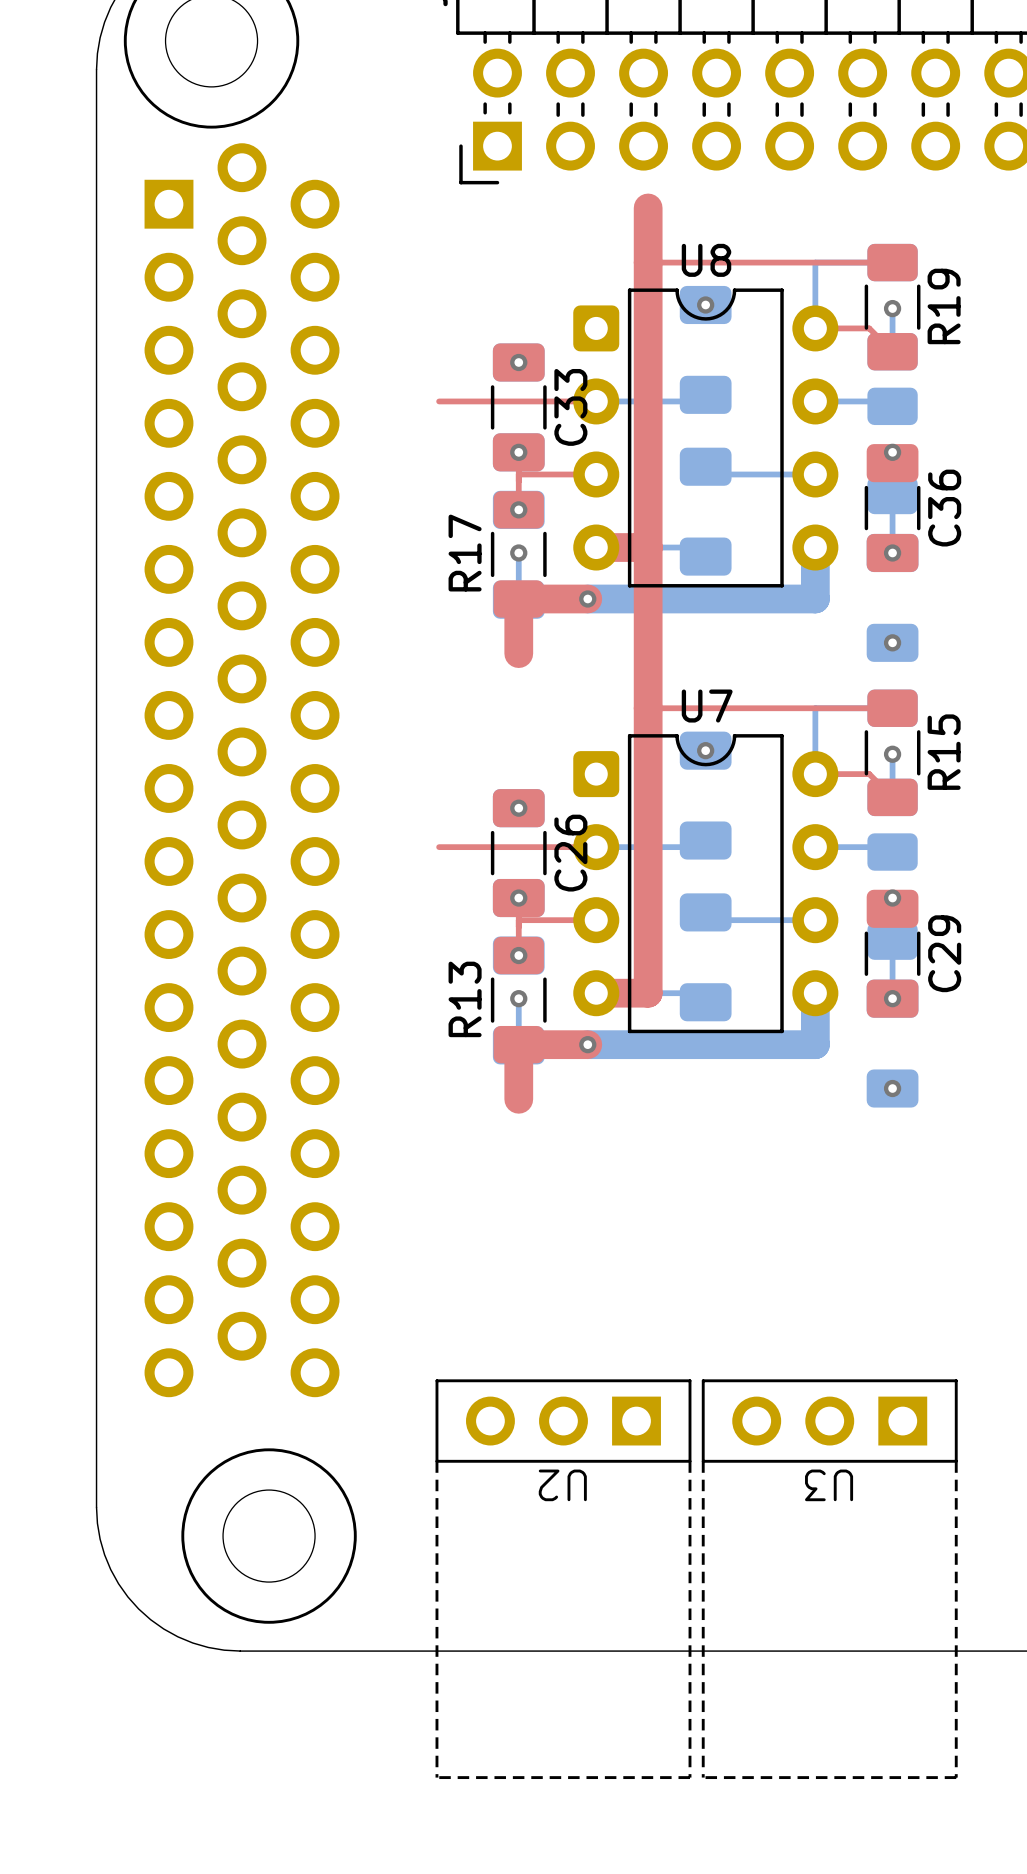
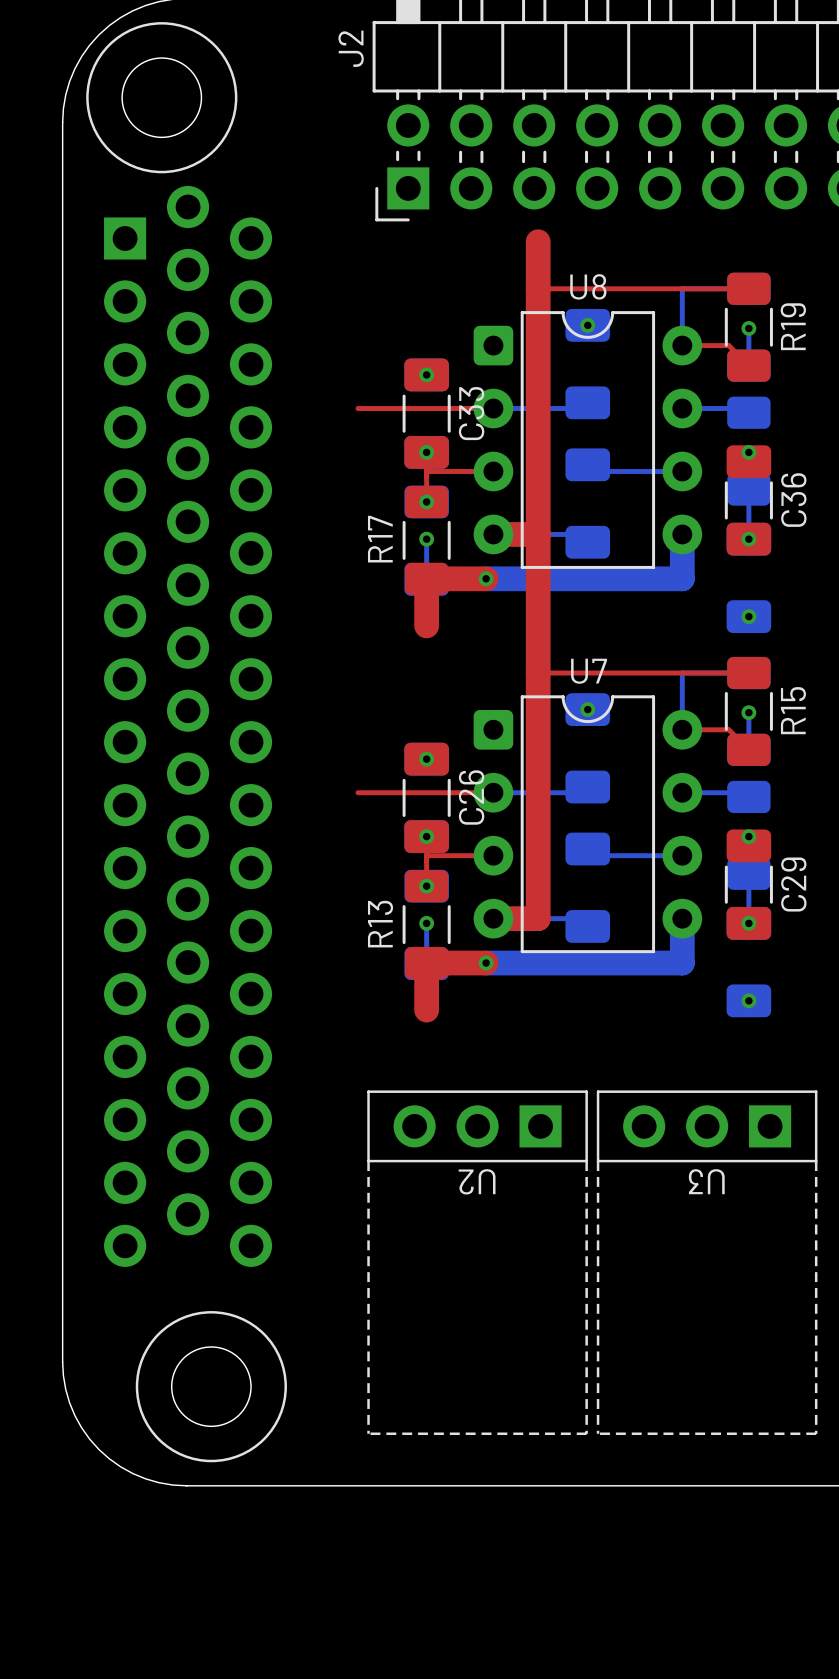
U2 position: (563, 1579) -> (477, 1262)
U3 position: (829, 1579) -> (707, 1262)

